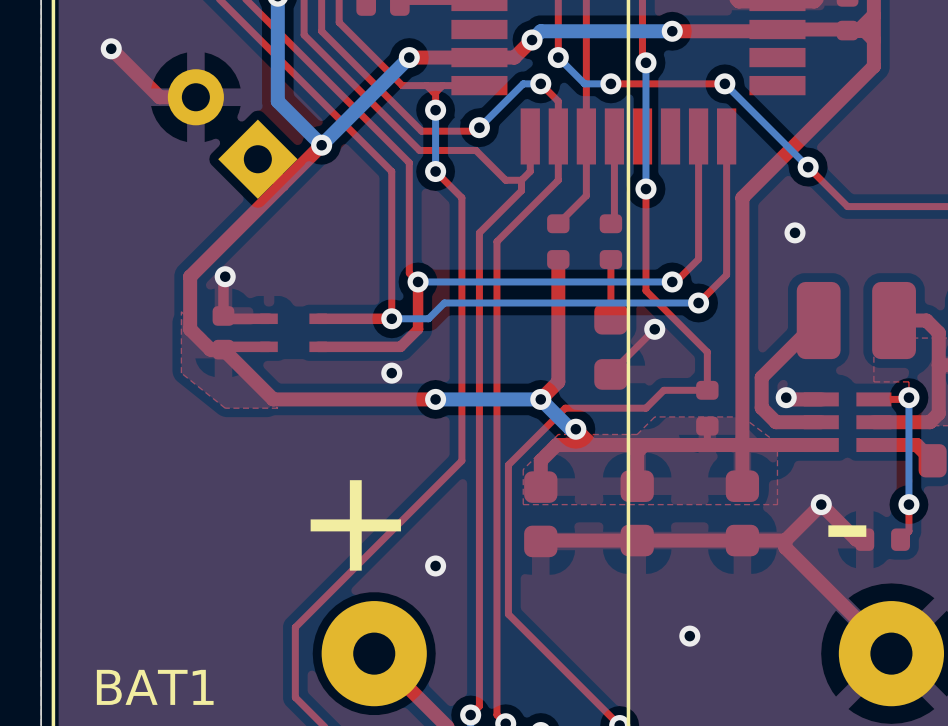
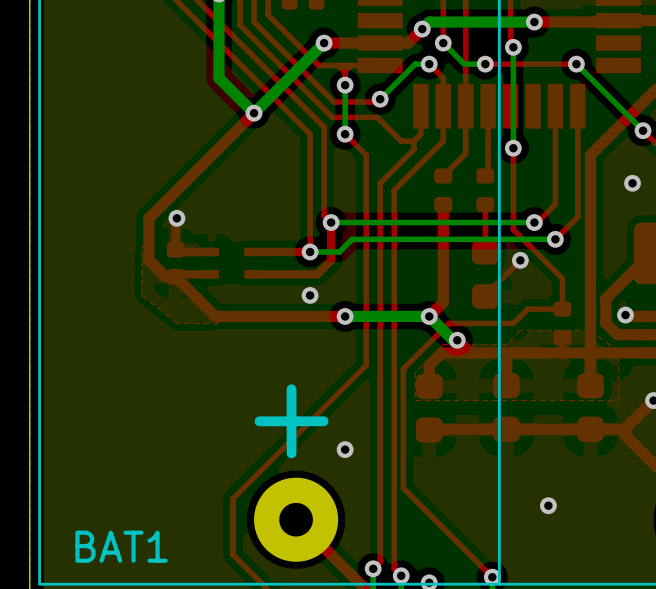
top track: (111, 48) (159, 97) (195, 97) -> none
via: (111, 48) -> none
part: (232, 134) -> none

